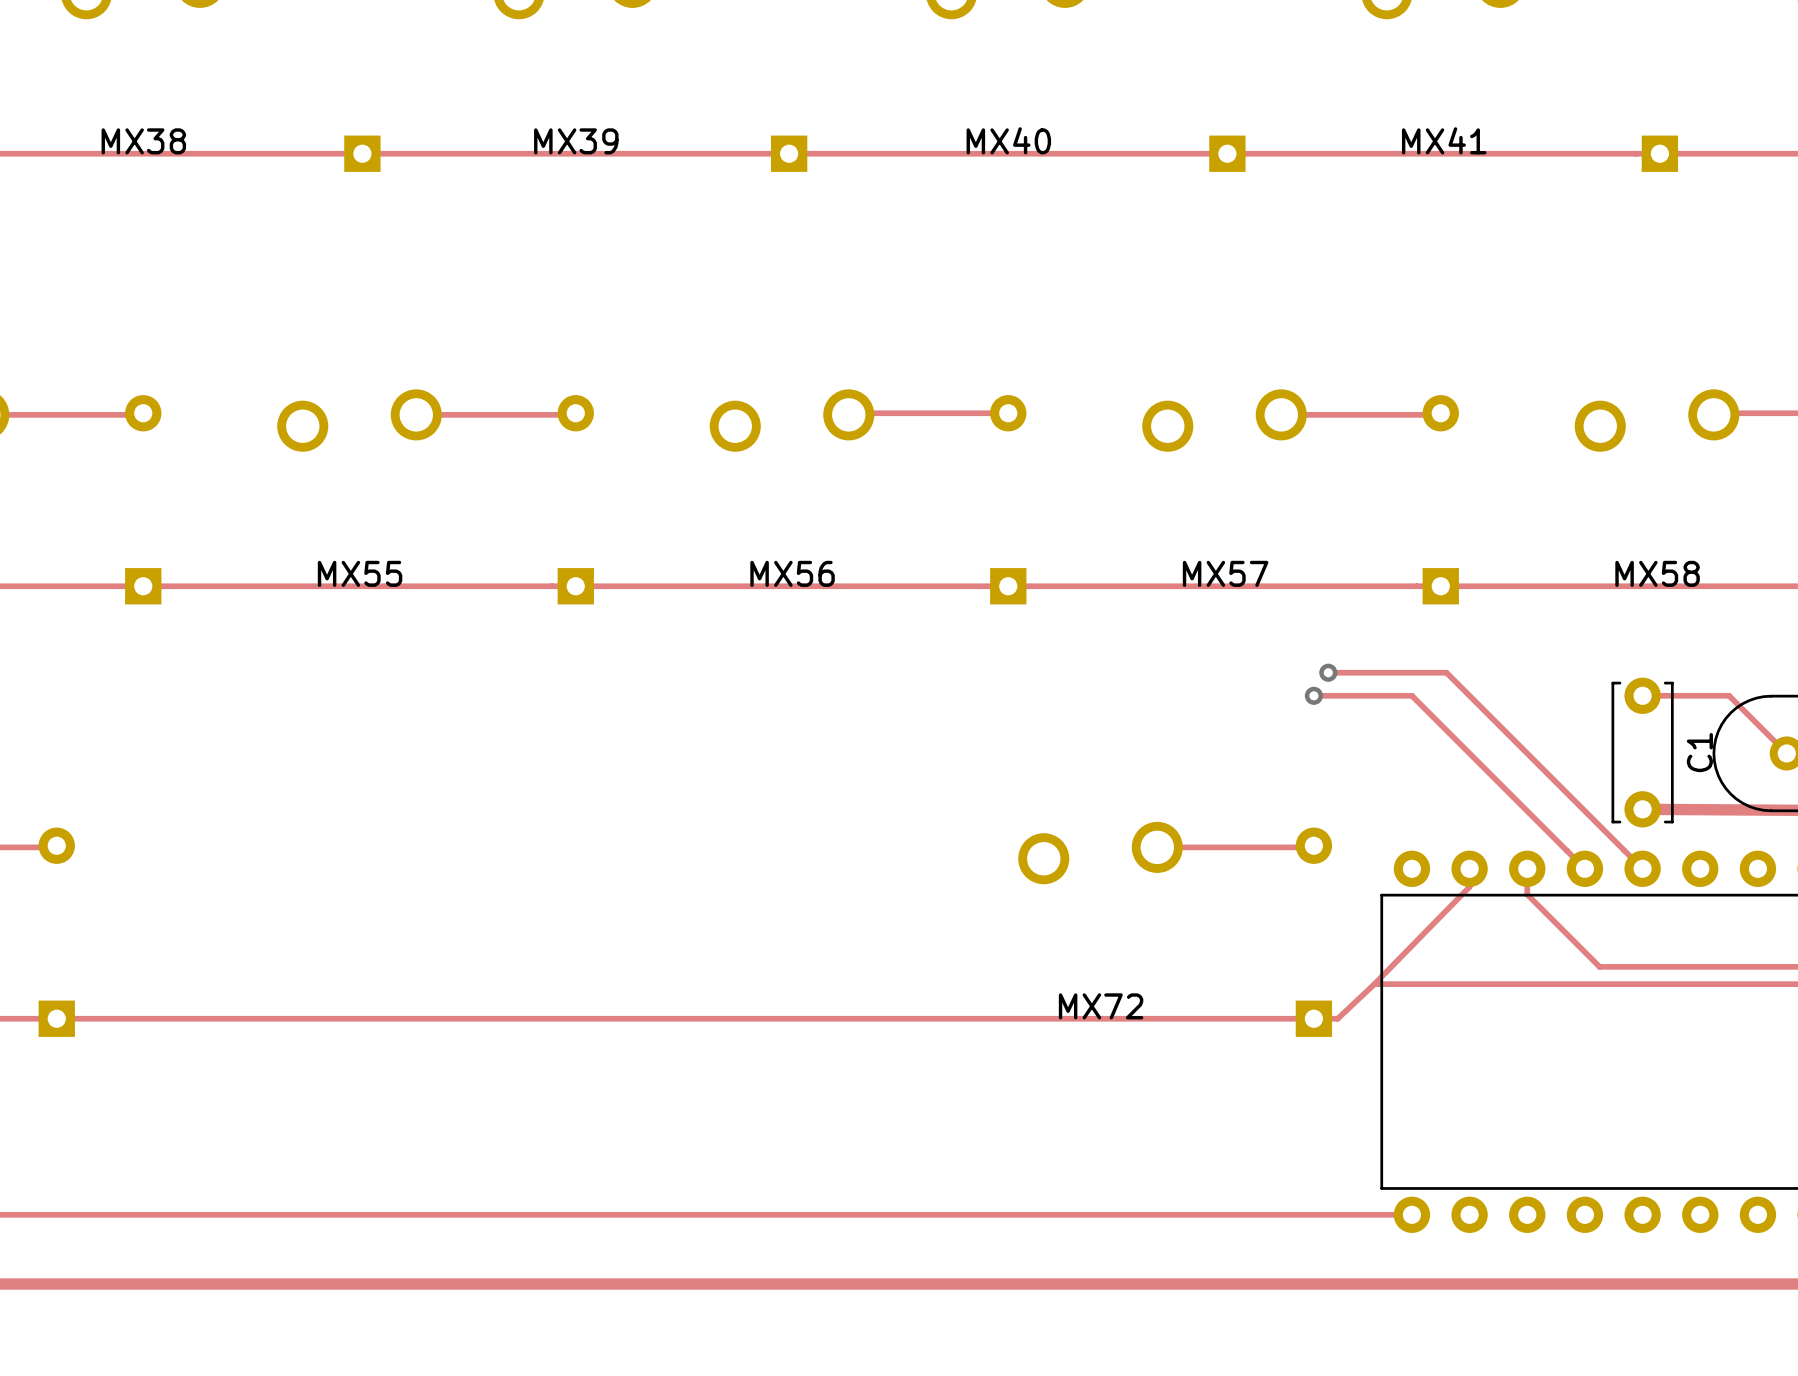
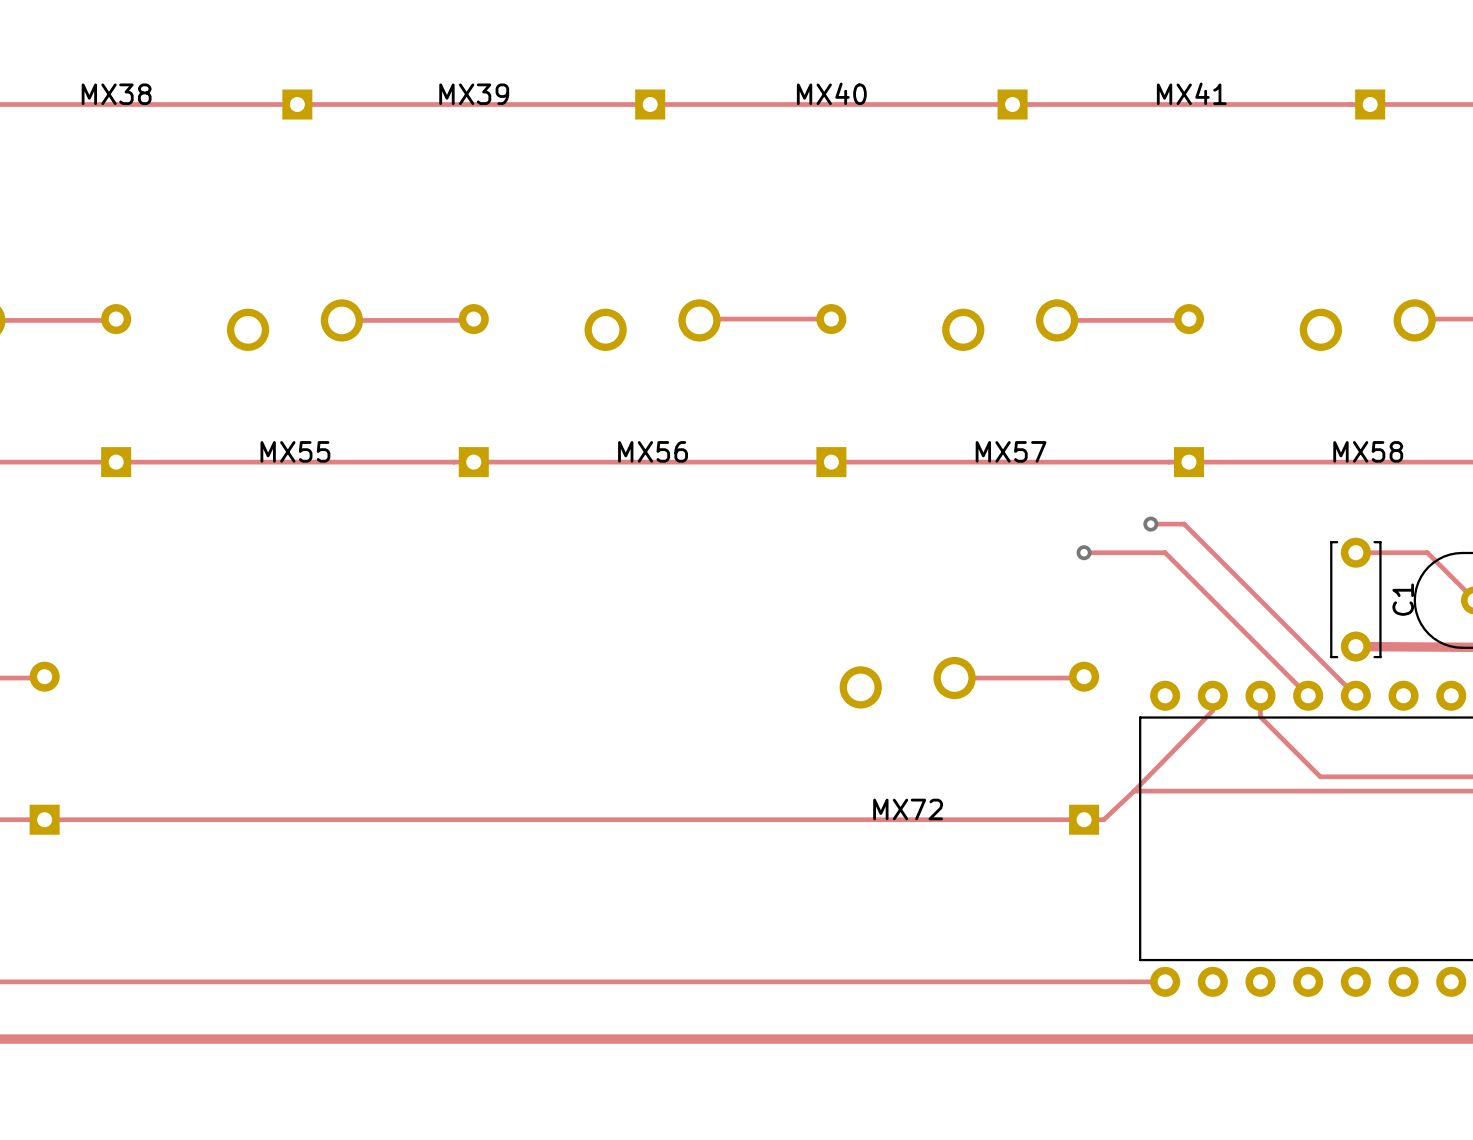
track: (1328, 672) (1446, 672) -> (1150, 524) (1184, 524) (1193, 533)
via position: (1328, 672) -> (1150, 524)

